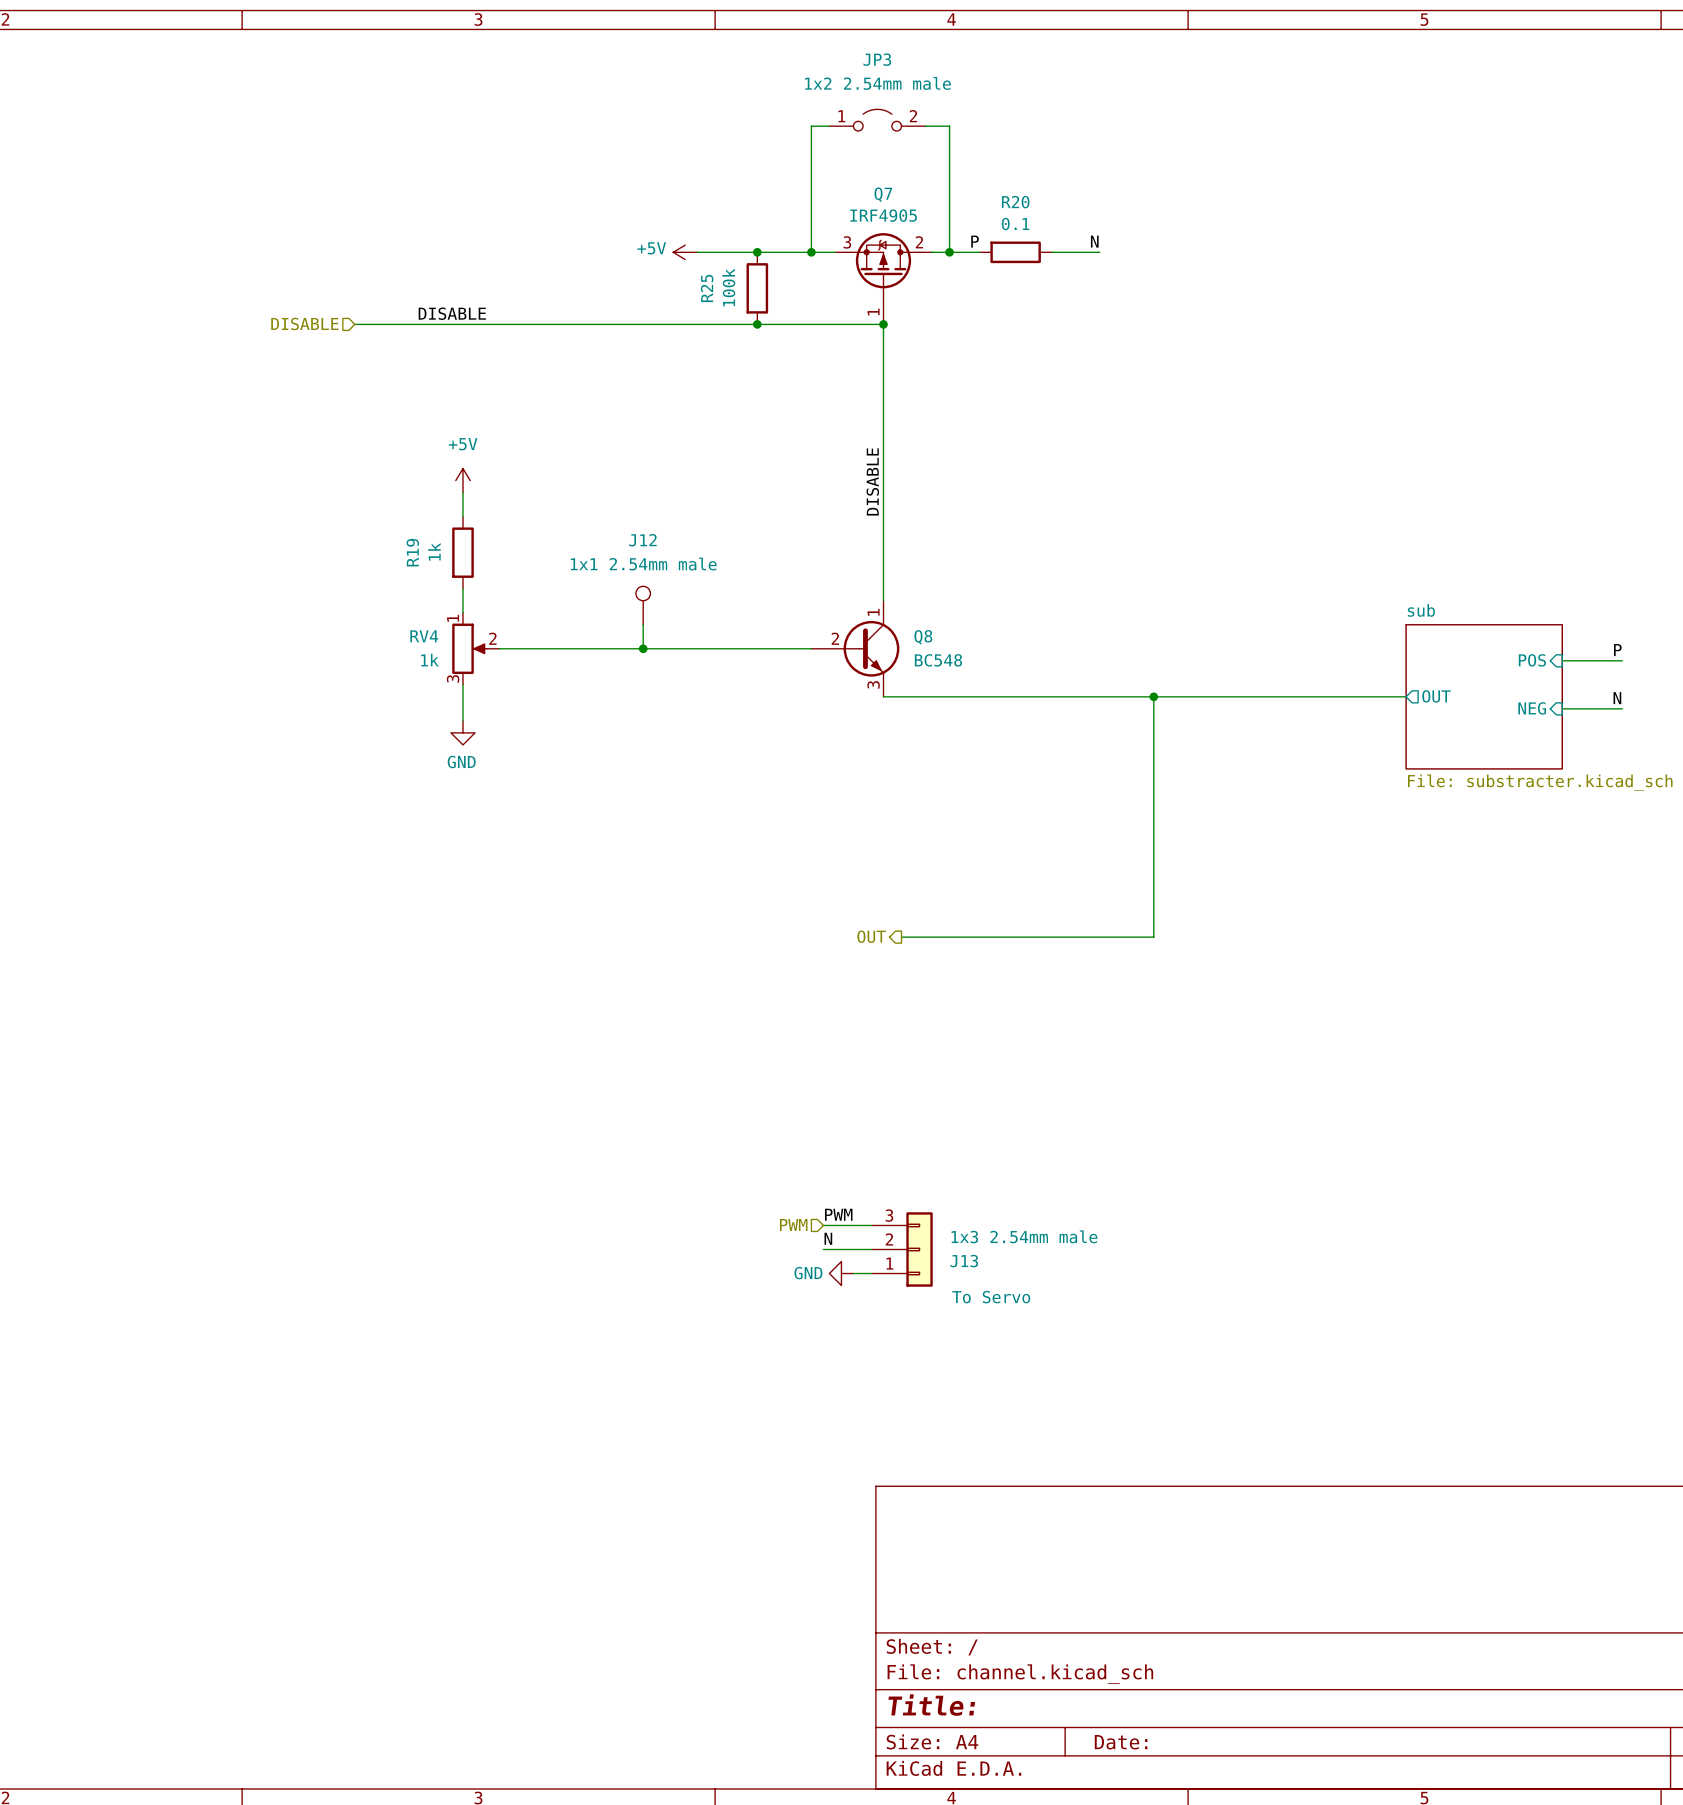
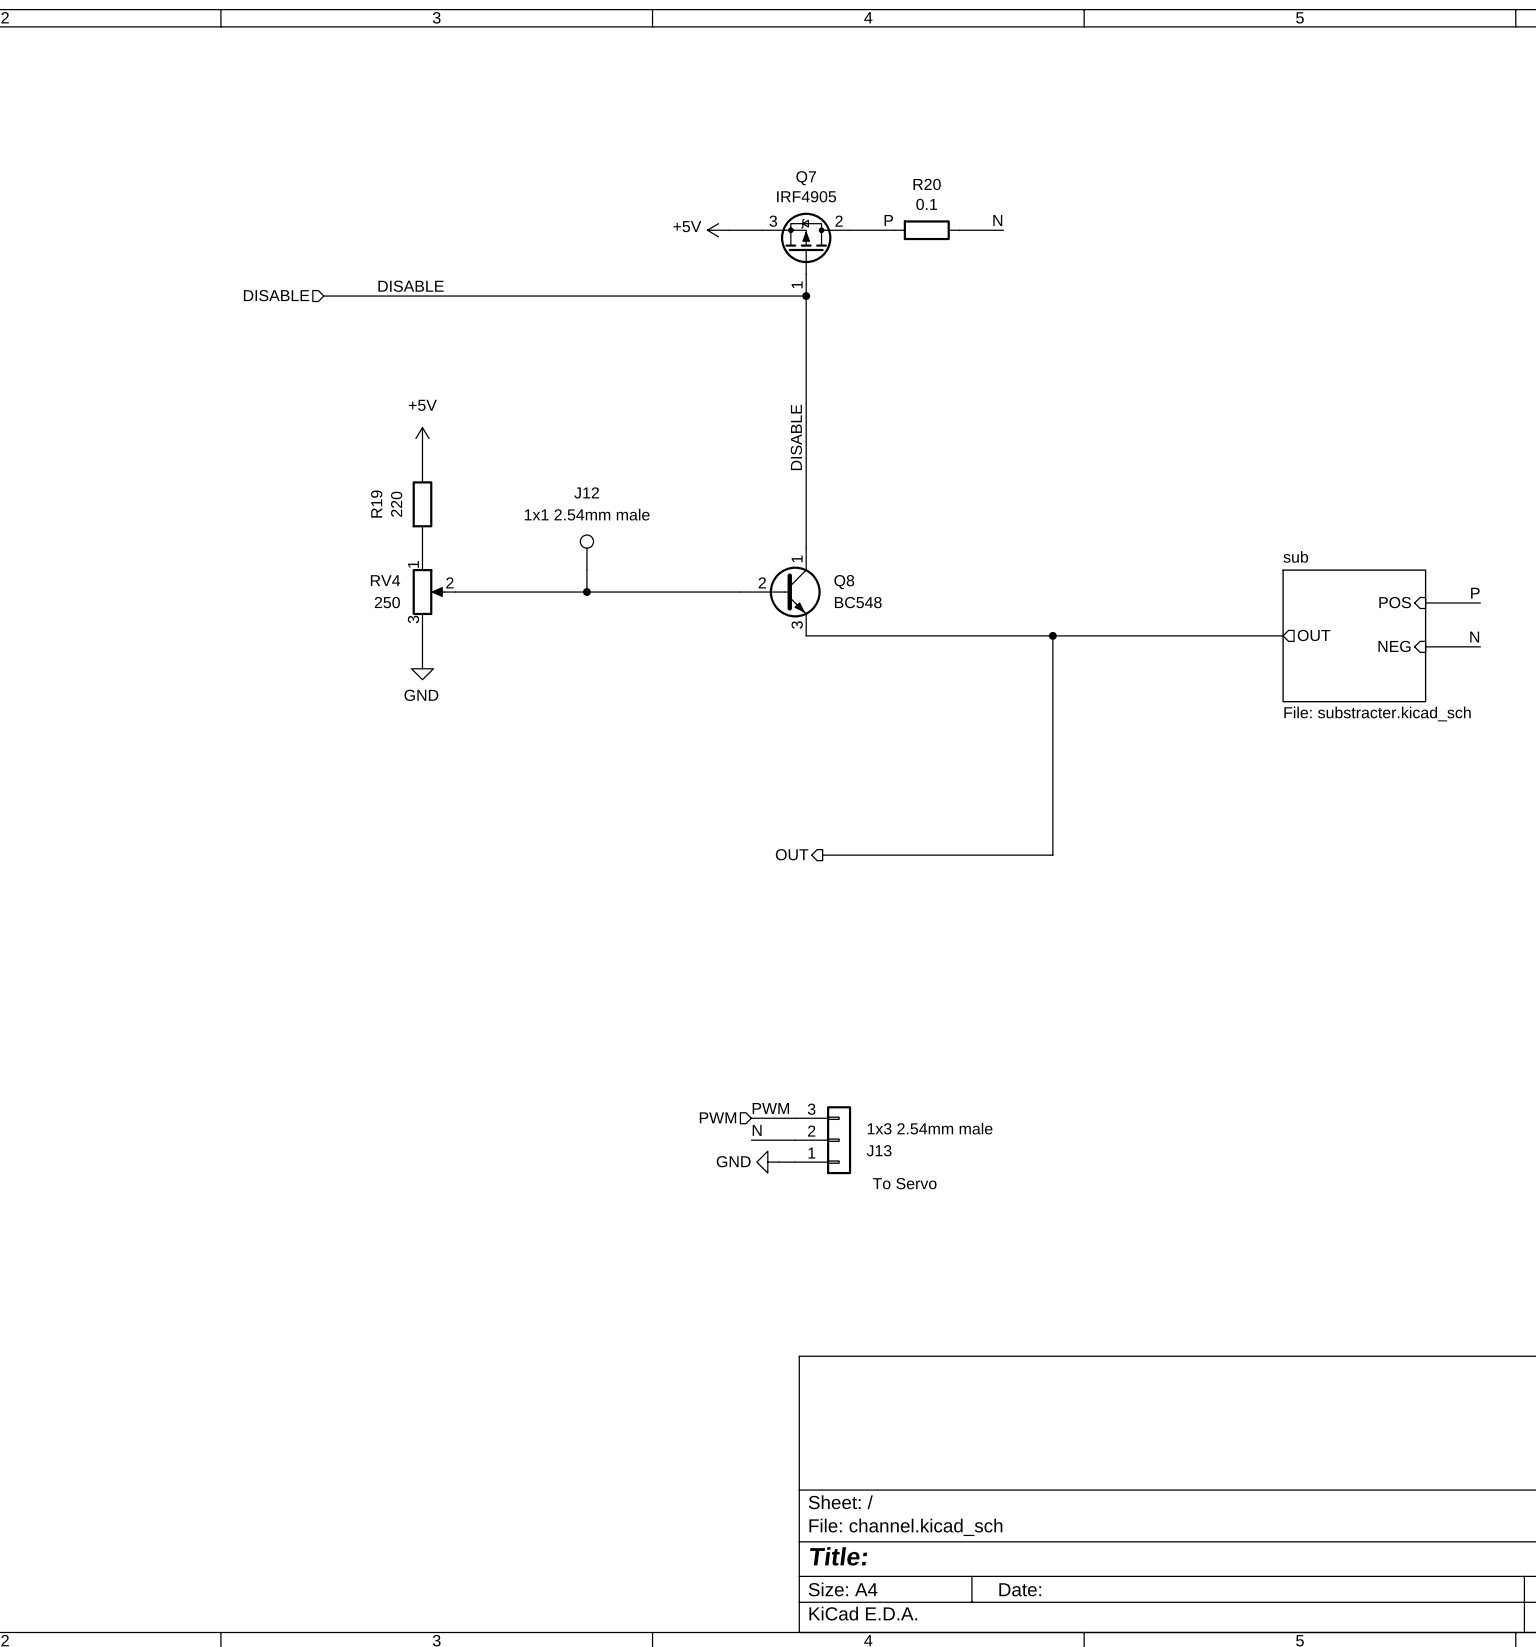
JP3: 1x2 2.54mm male (877, 120) -> none
wire: (829, 126) (811, 126) (811, 252) -> none
wire: (925, 126) (949, 126) (949, 252) -> none
power symbol position: +5V (685, 252) -> +5V (718, 230)
wire: (697, 252) (799, 252) -> none
junction: (757, 252) -> none
junction: (811, 252) -> none
junction: (949, 252) -> none
R25: 100k (757, 288) -> none
junction: (757, 324) -> none
R19 value: 1k (434, 551) -> 220 (396, 504)
RV4 value: 1k (429, 660) -> 250 (387, 602)

